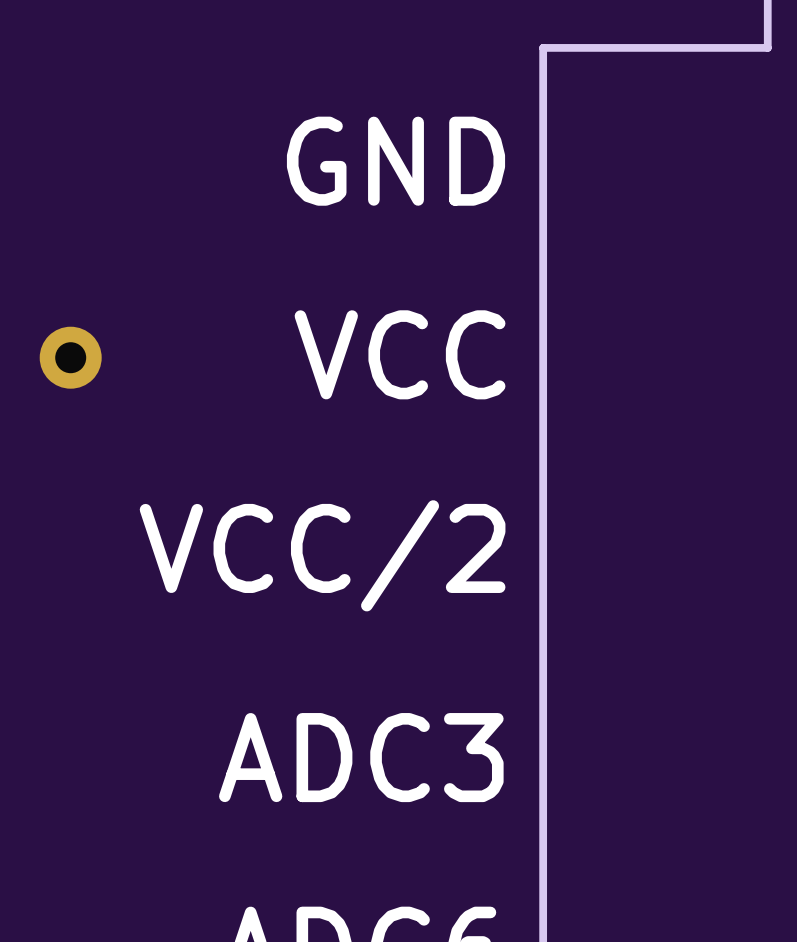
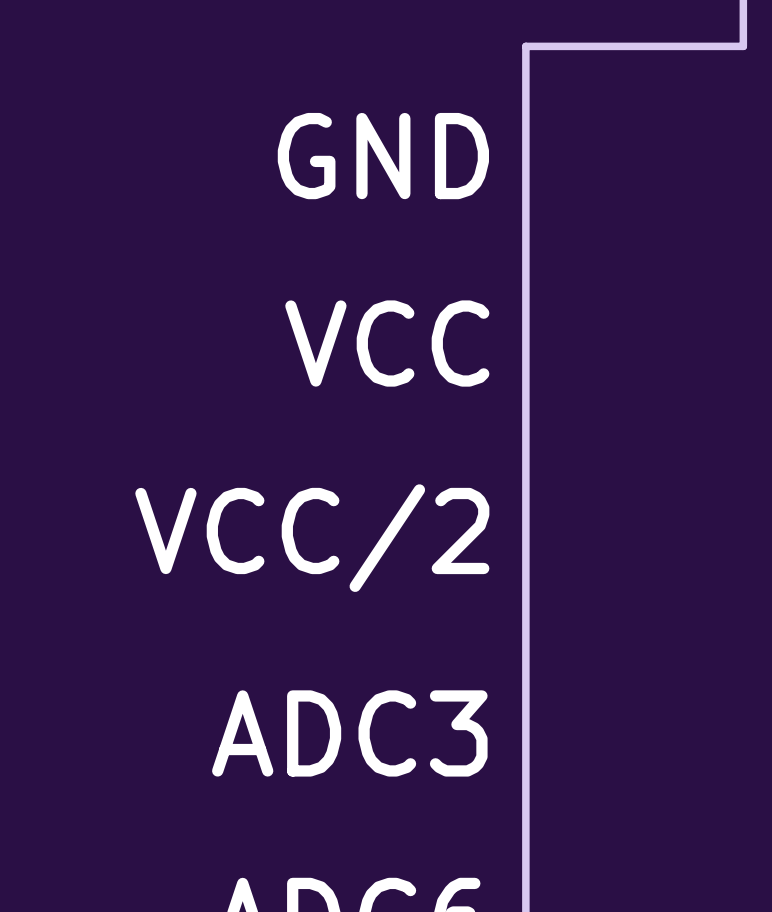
via: (70, 357) -> none

